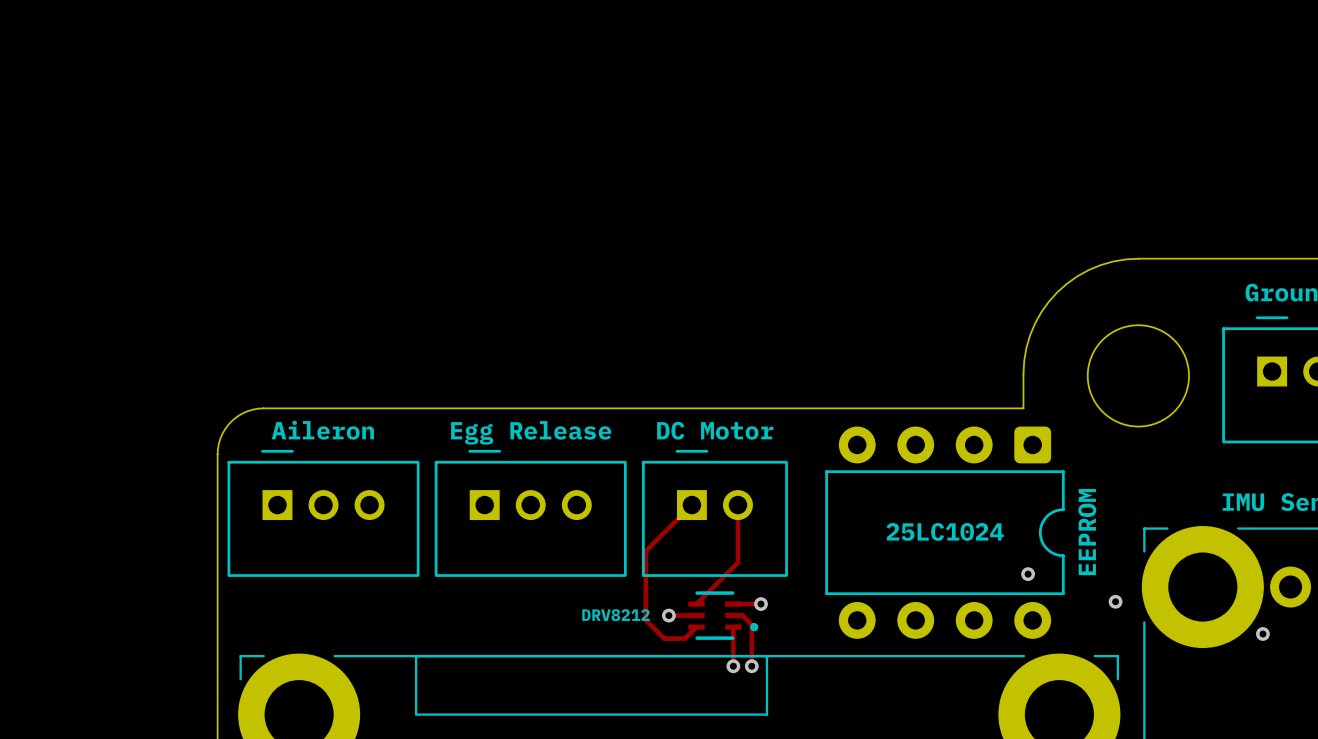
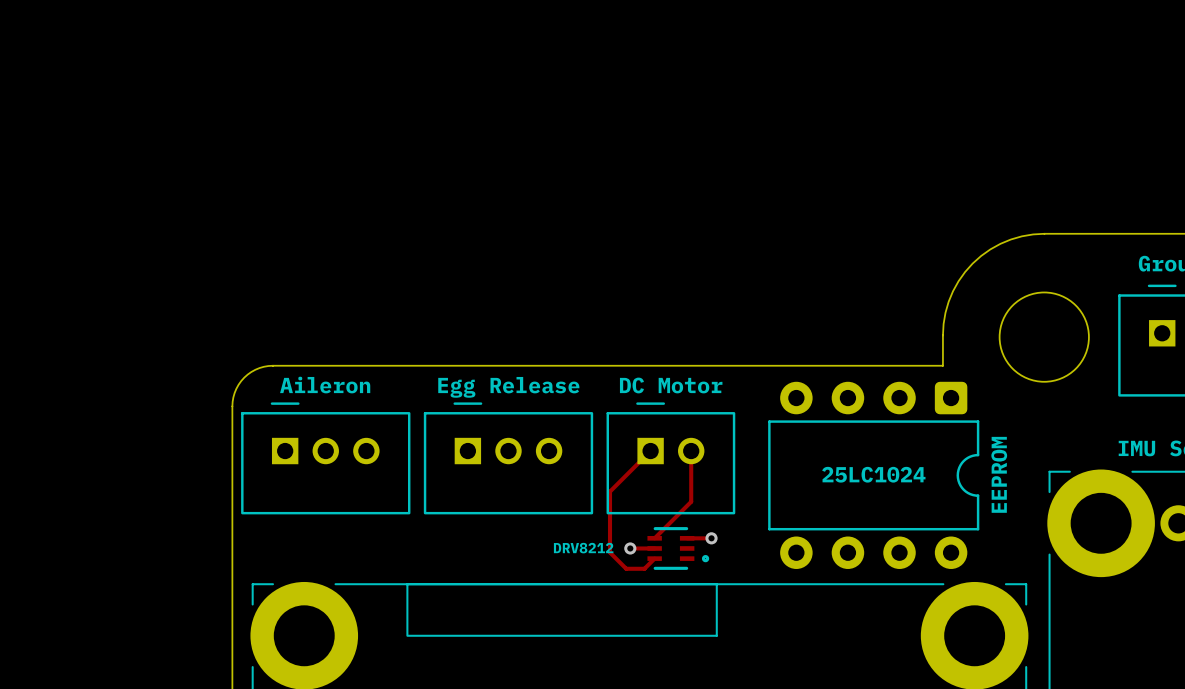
via: (1028, 574) -> none
via: (1115, 601) -> none
track: (733, 615) (742, 615) (751, 624) (751, 666) -> none
track: (733, 627) (733, 666) -> none
via: (1262, 634) -> none
via: (733, 666) -> none
via: (751, 666) -> none

